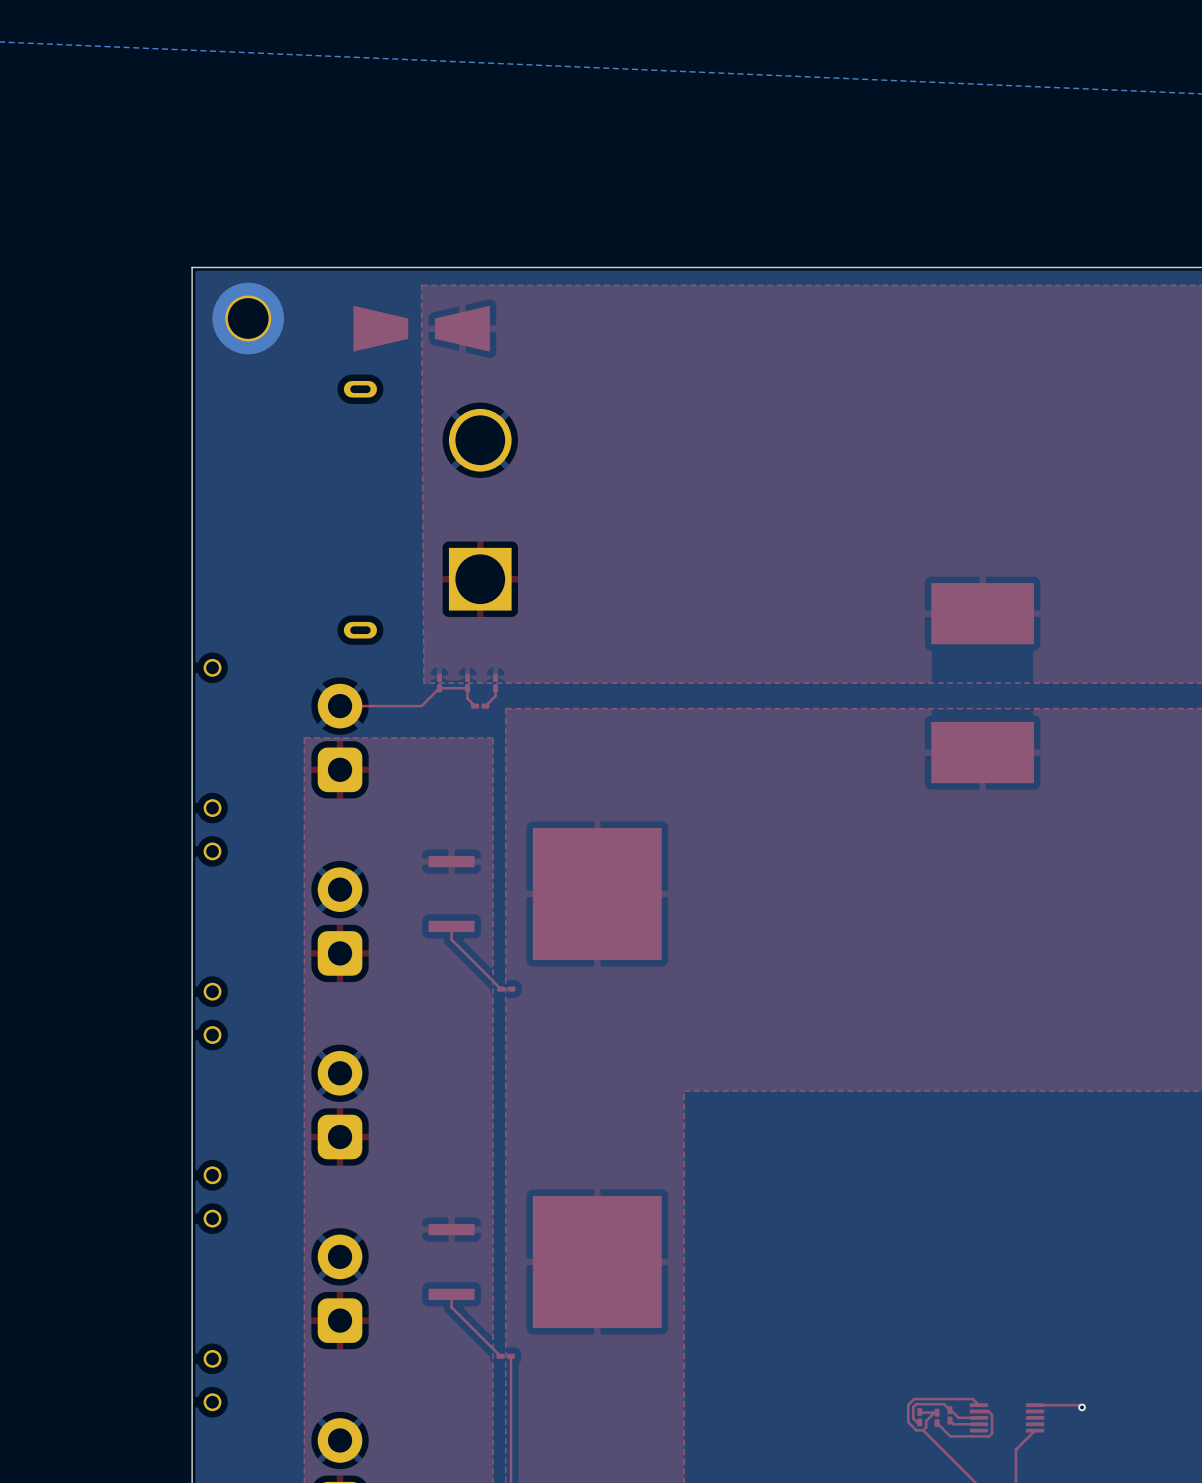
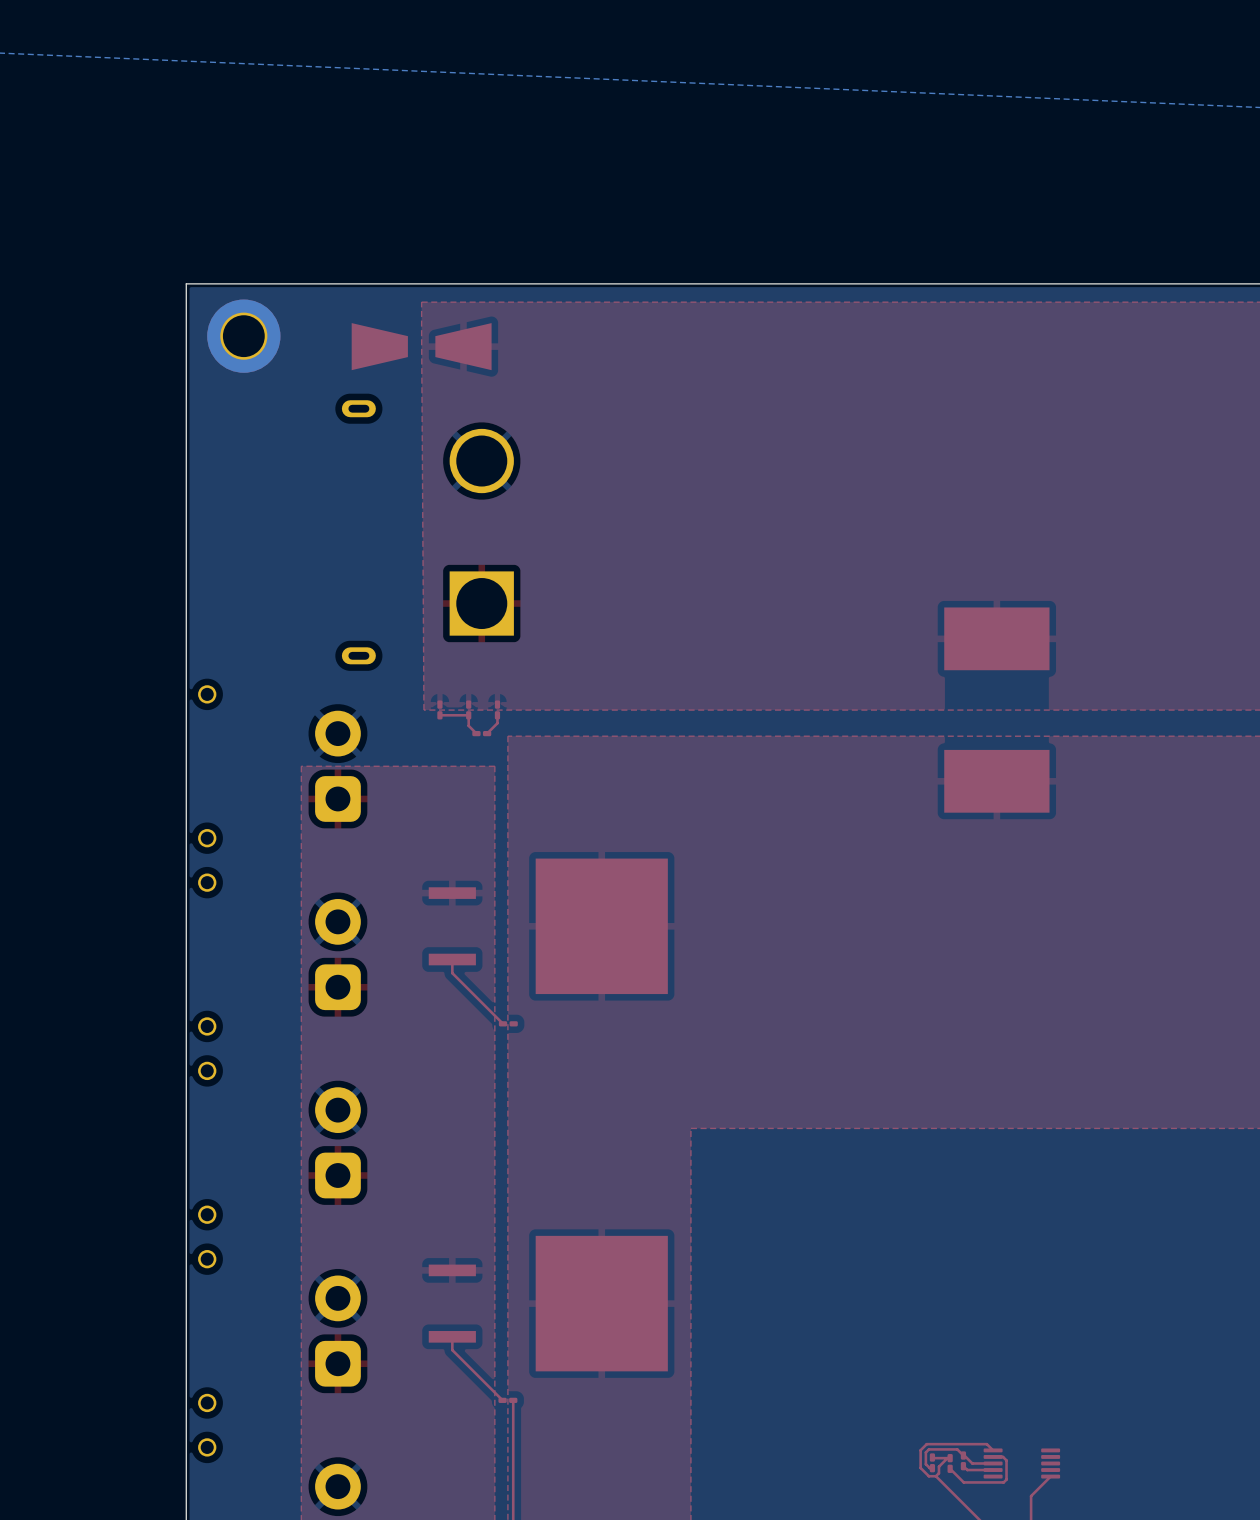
top track: (439, 688) (421, 706) (340, 706) -> none
top track: (1035, 1405) (1079, 1405) (1082, 1407) -> none
via: (1082, 1407) -> none

